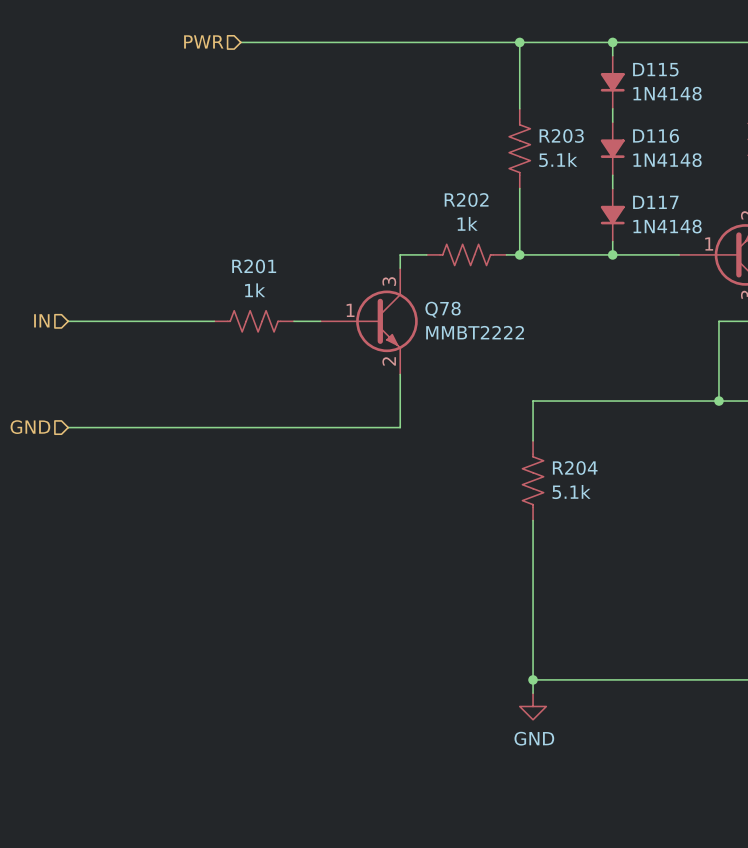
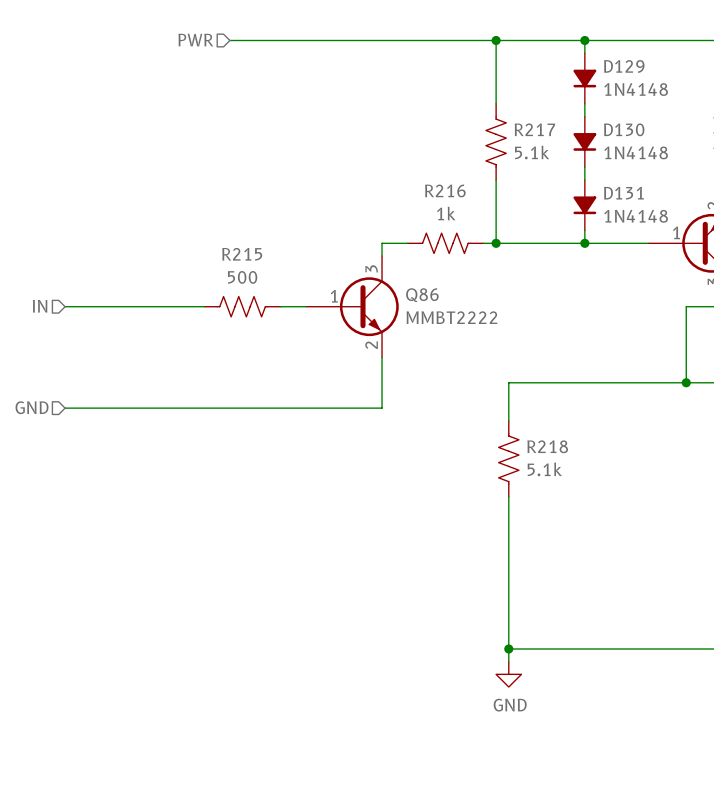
D115 name: D115 (655, 69) -> D129 (624, 66)
R203 name: R203 (561, 135) -> R217 (534, 129)
D116 name: D116 (656, 135) -> D130 (624, 129)
R202 name: R202 (466, 199) -> R216 (445, 190)
D117 name: D117 (655, 202) -> D131 (623, 193)
R201 name: R201 (254, 266) -> R215 (242, 254)
R201 value: 1k (255, 290) -> 500 (242, 277)
Q78 name: Q78 (443, 309) -> Q86 (422, 295)
R204 name: R204 (575, 468) -> R218 (547, 446)

